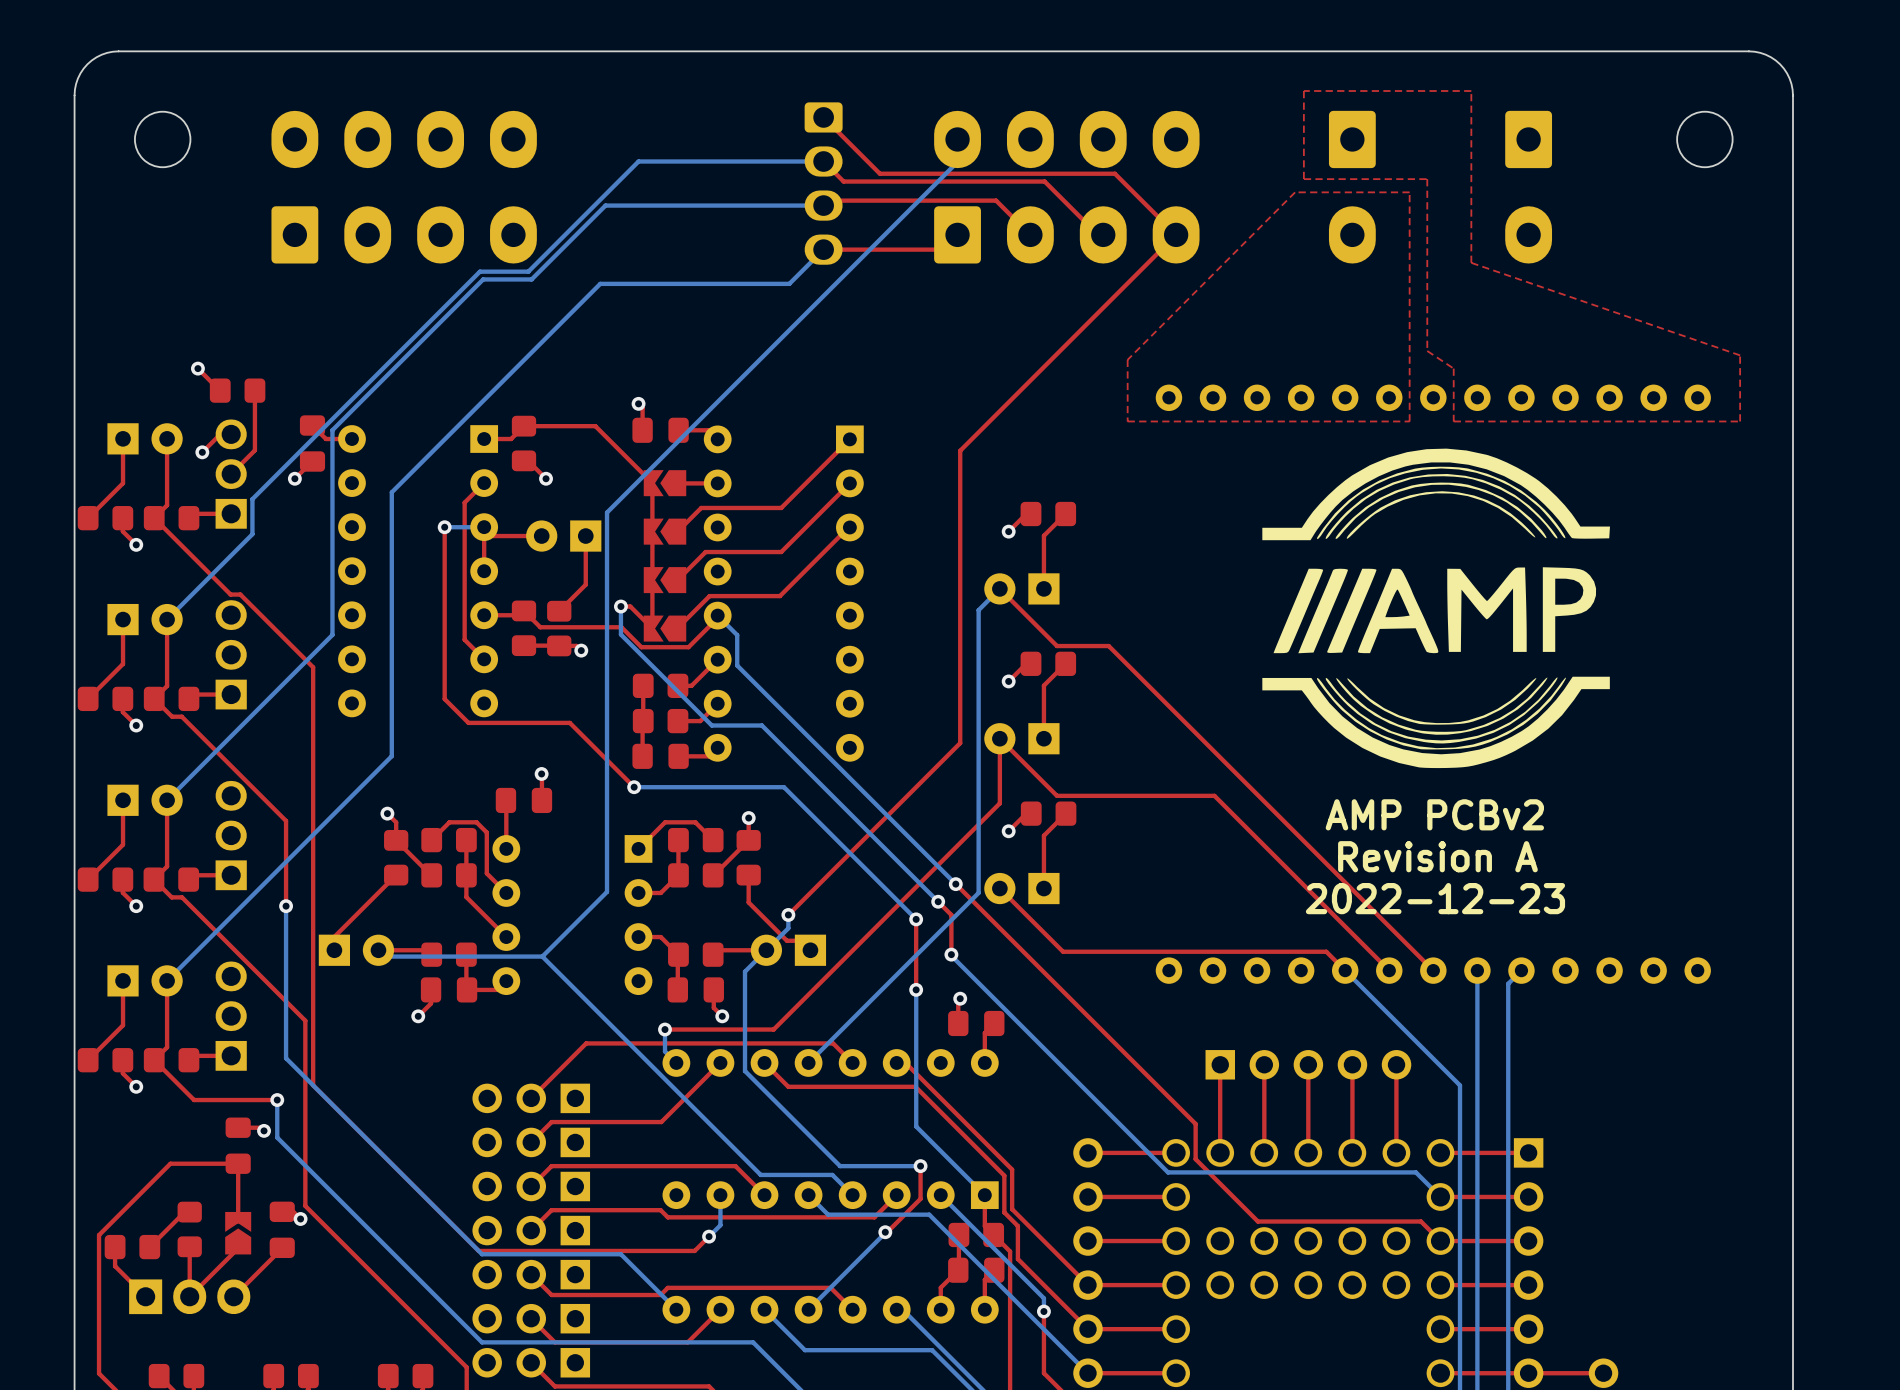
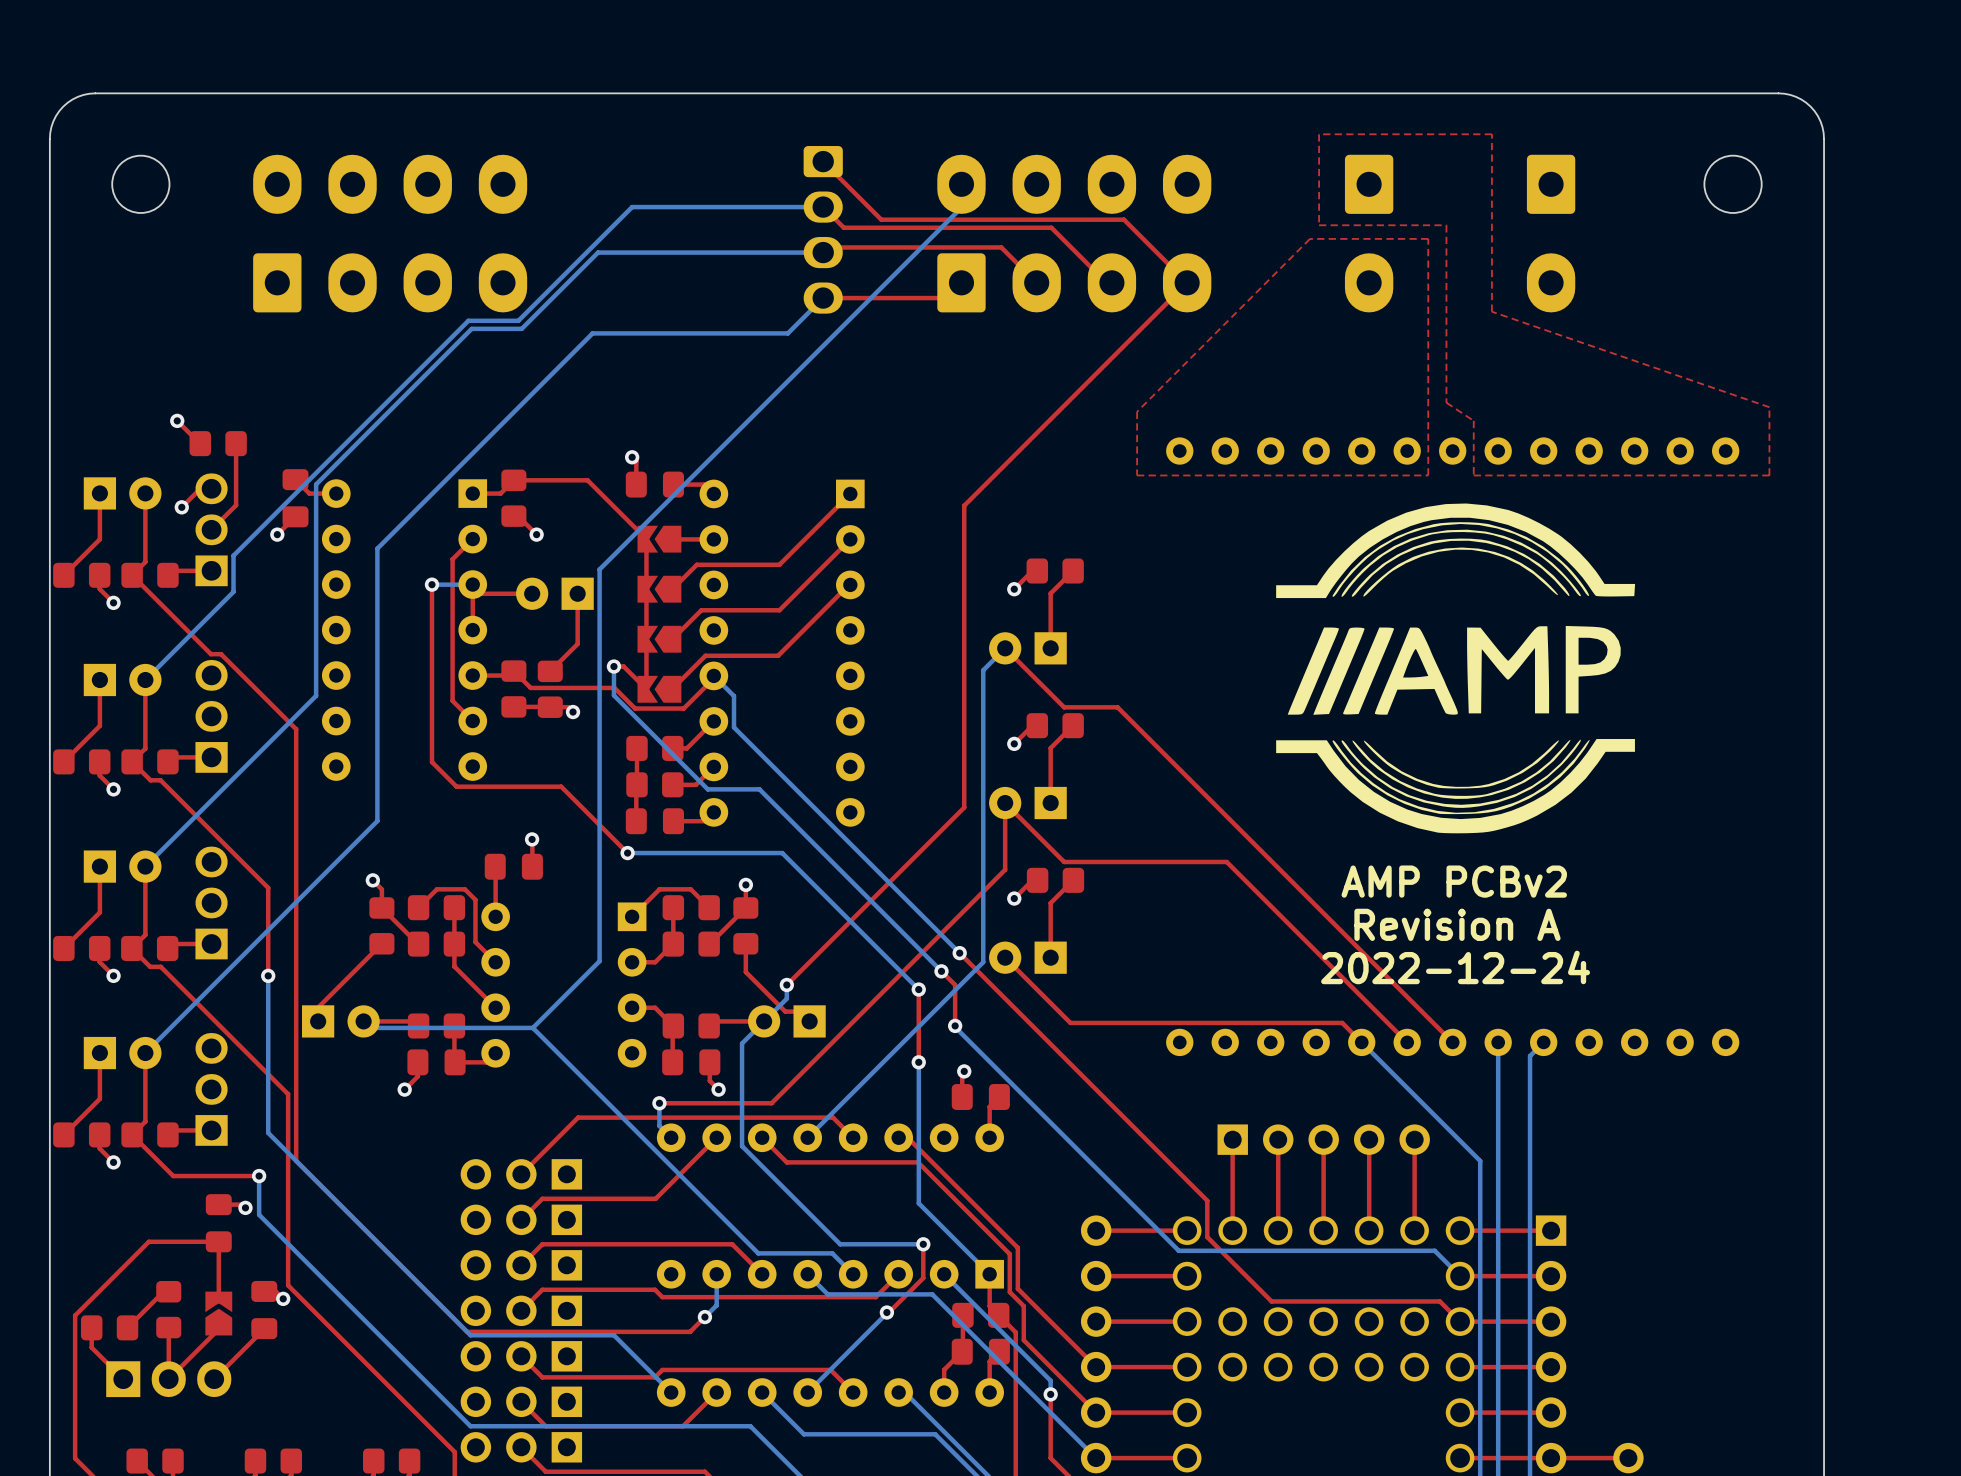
text: 2022-12-23 (1435, 898) -> 2022-12-24 (1455, 967)

